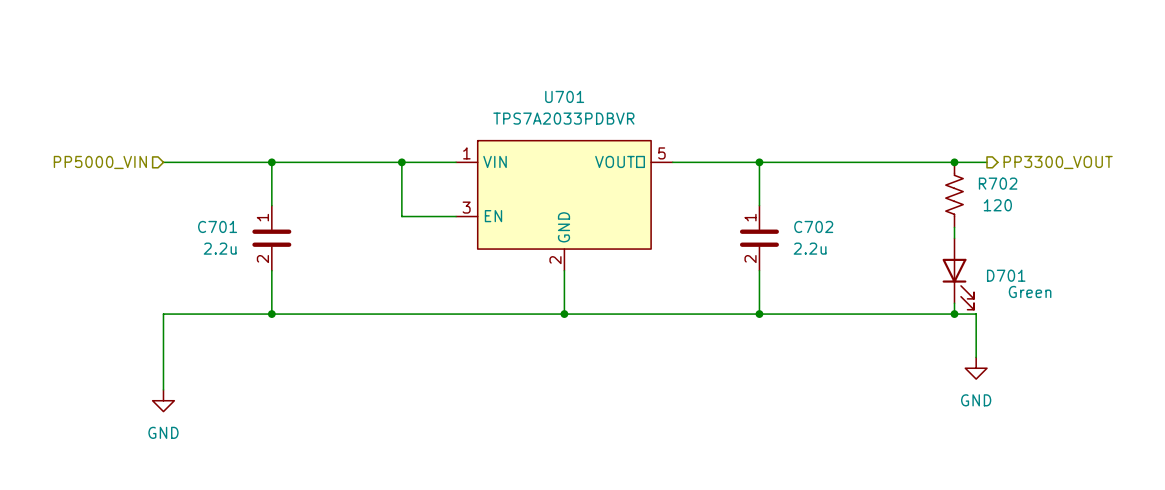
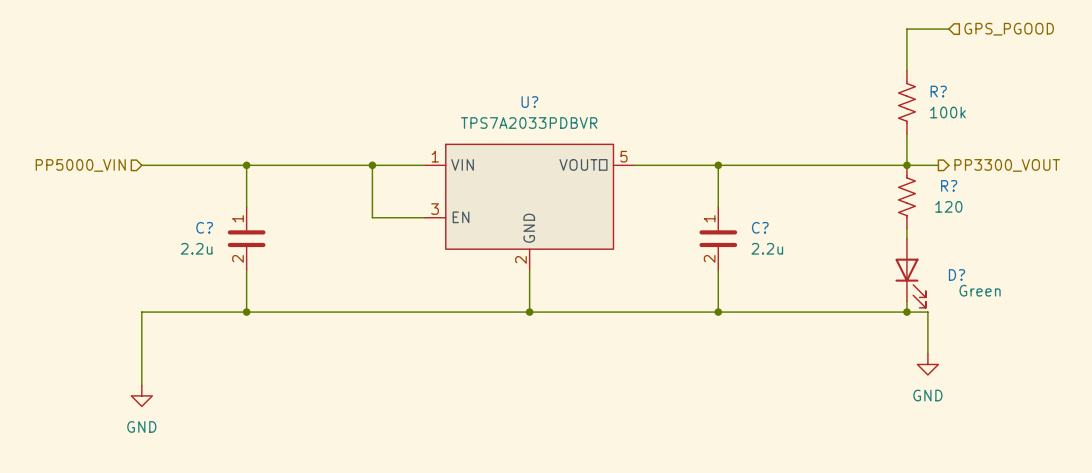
wire: none -> (948, 29) (906, 29) (906, 70)
hierarchical label: none -> GPS_PGOOD (1009, 29)
U701 name: U701 (564, 96) -> U? (529, 102)
R?: none -> 100k (906, 102)
wire: none -> (906, 133) (906, 165)
R702 name: R702 (998, 183) -> R? (949, 185)
C701 name: C701 (217, 226) -> C? (204, 227)
C702 name: C702 (813, 226) -> C? (760, 227)
D701 name: D701 (1006, 275) -> D? (956, 274)

